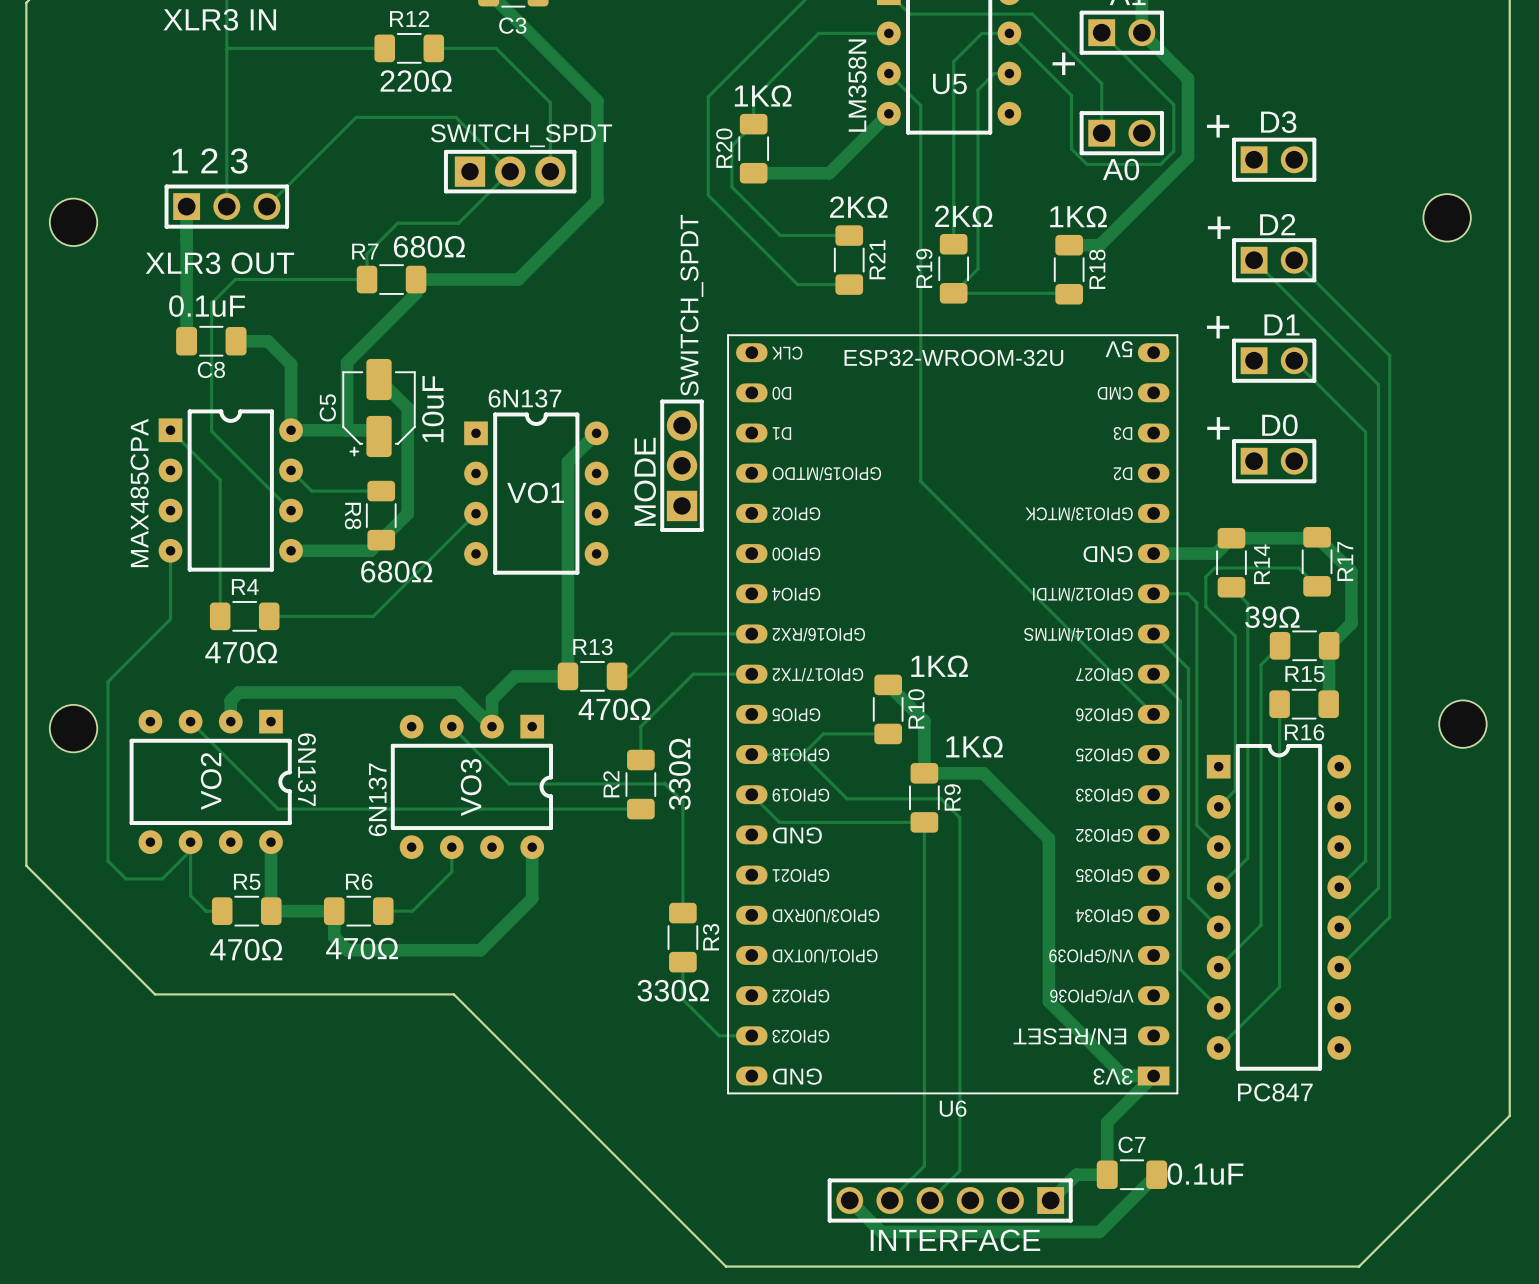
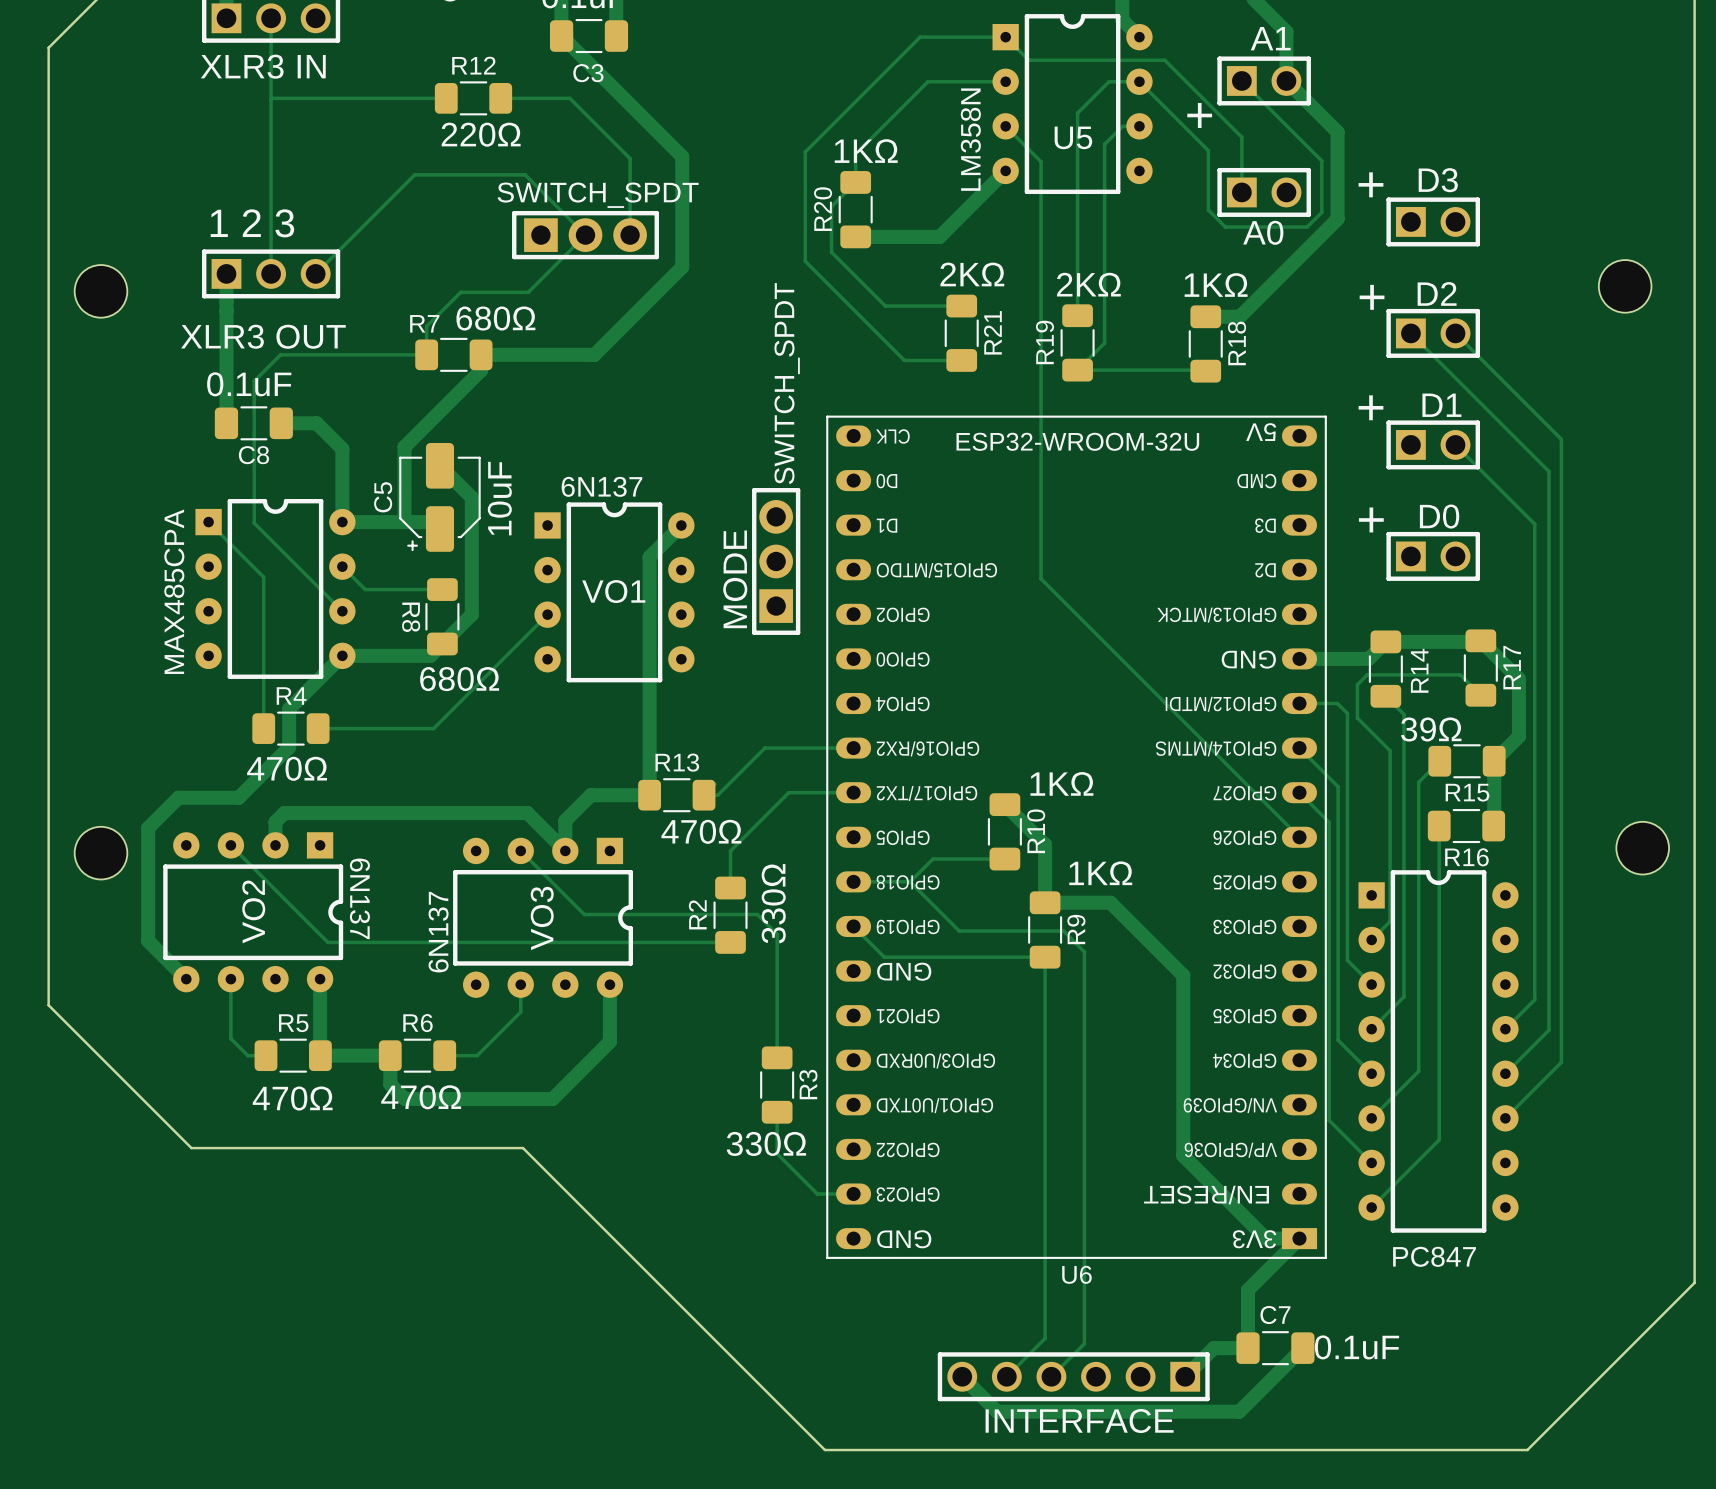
track: (170, 550) (170, 619) (107, 681) (107, 860) (125, 878) (162, 878) (190, 850) -> none
track: none -> (342, 655) (289, 709) (289, 747) (238, 797) (178, 797) (148, 828) (148, 941) (186, 979)

